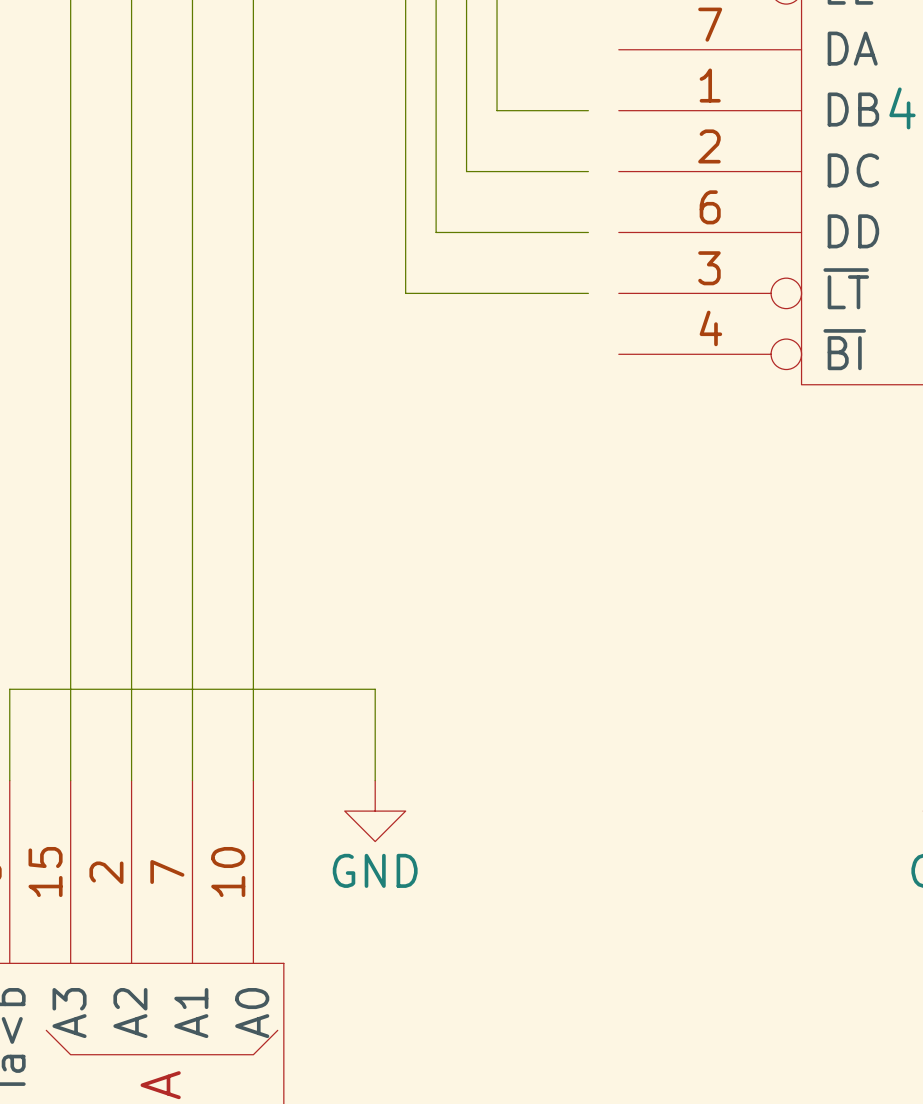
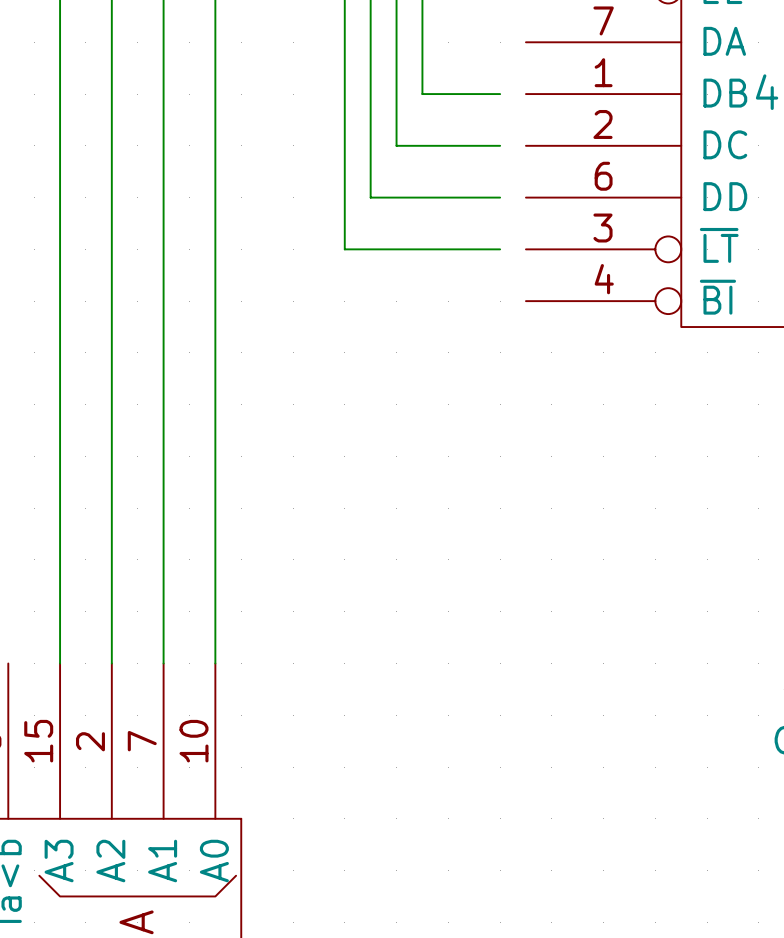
wire: (9, 780) (9, 689) (375, 689) (375, 780) -> none
power symbol: GND (375, 811) -> none

